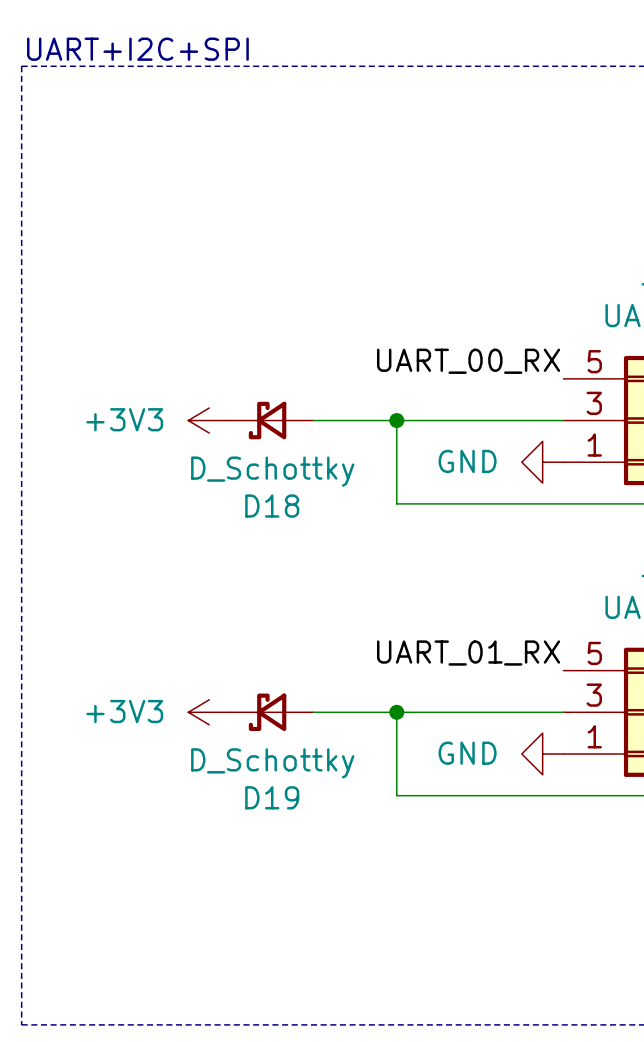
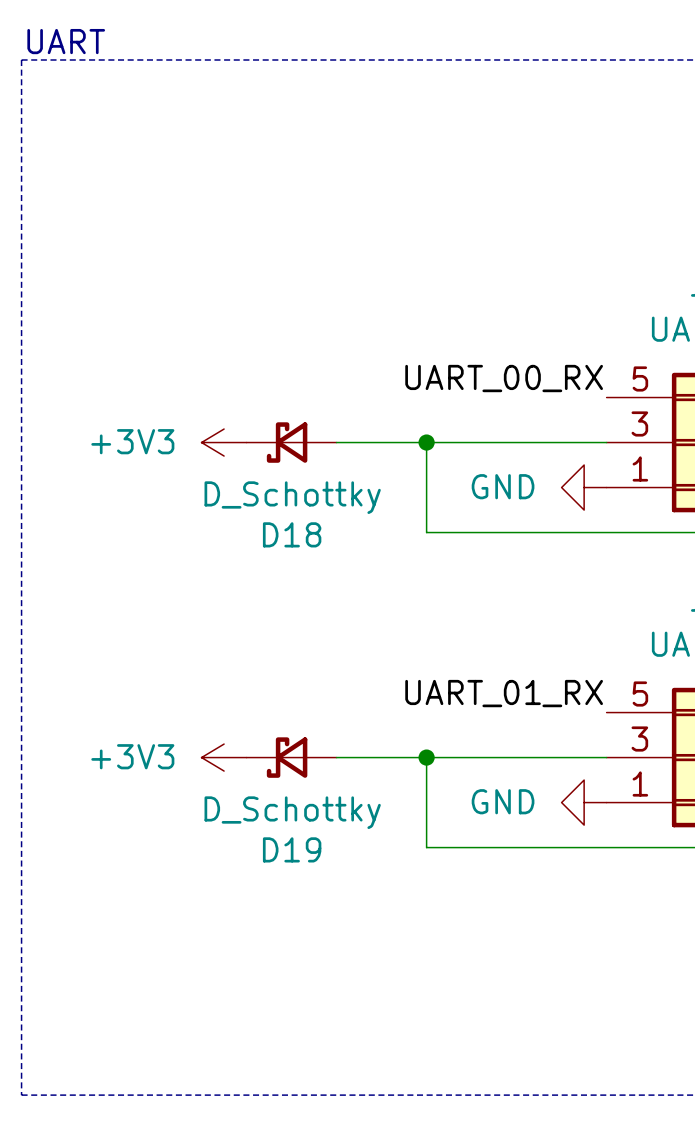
text: UART+I2C+SPI (137, 49) -> UART (66, 41)

